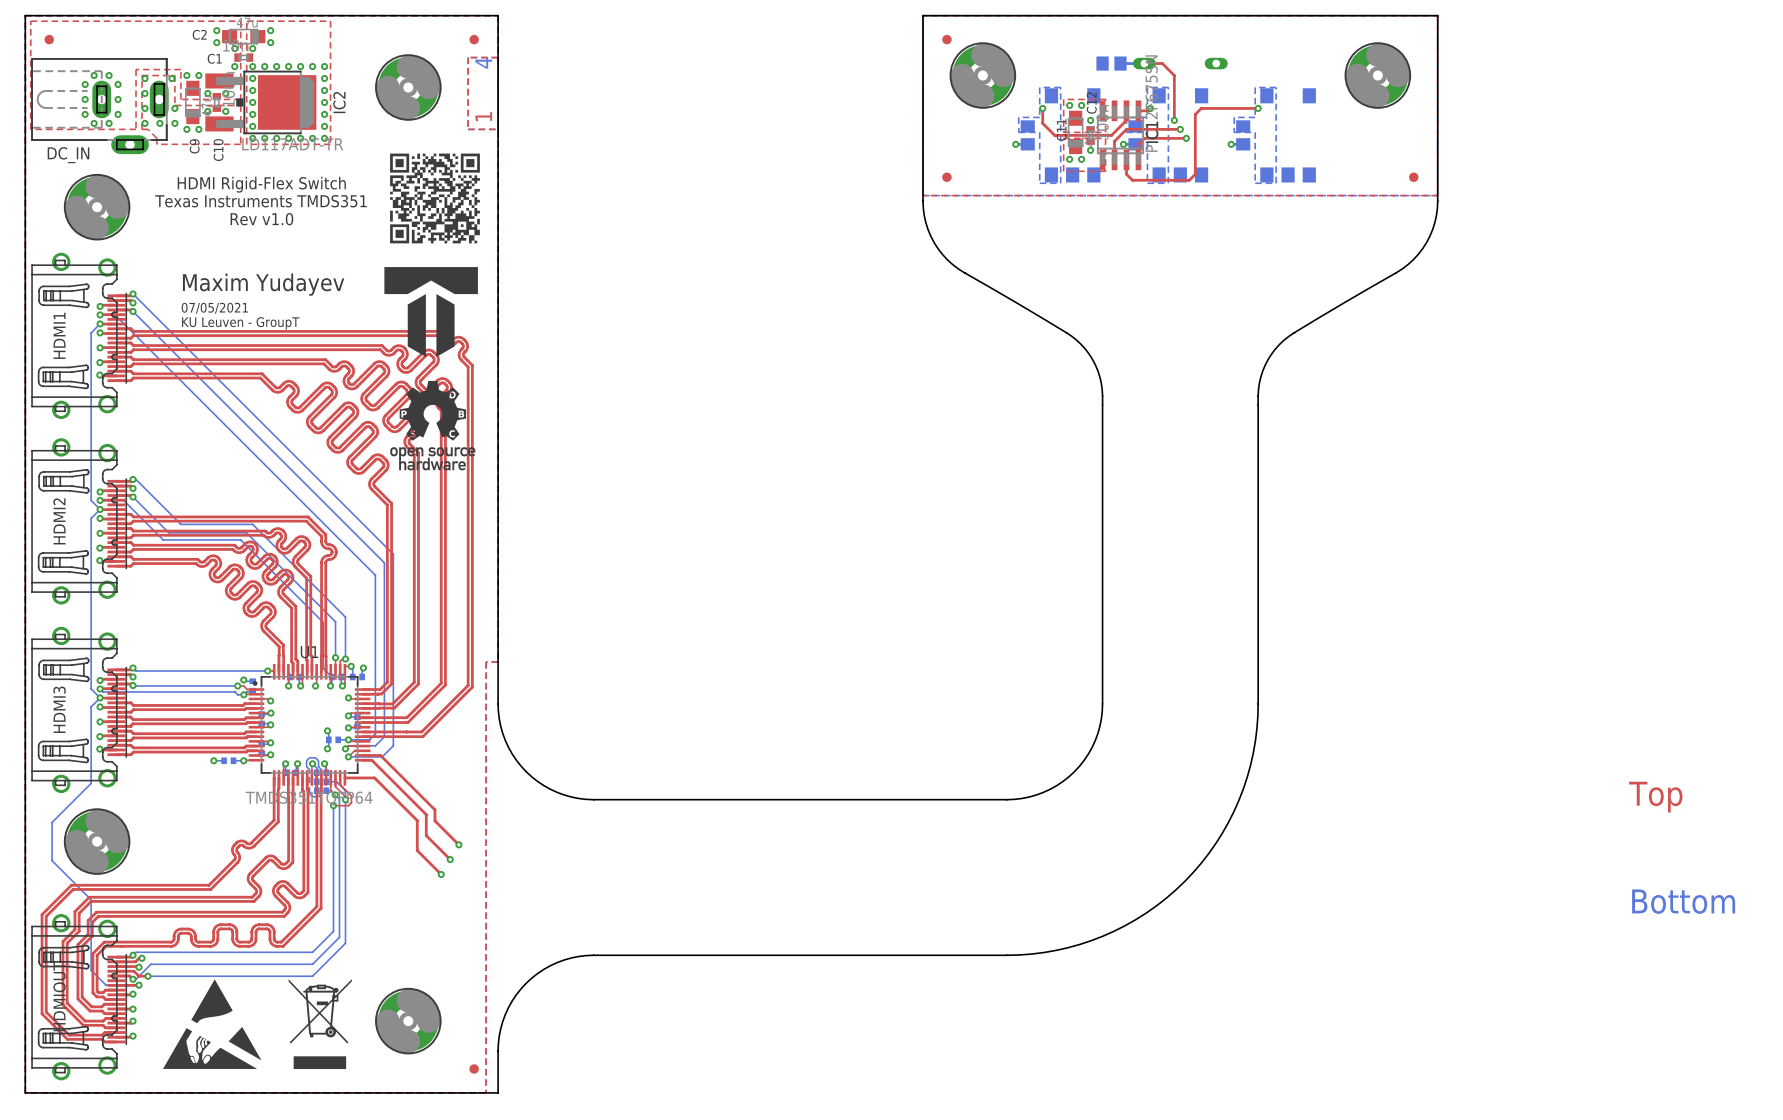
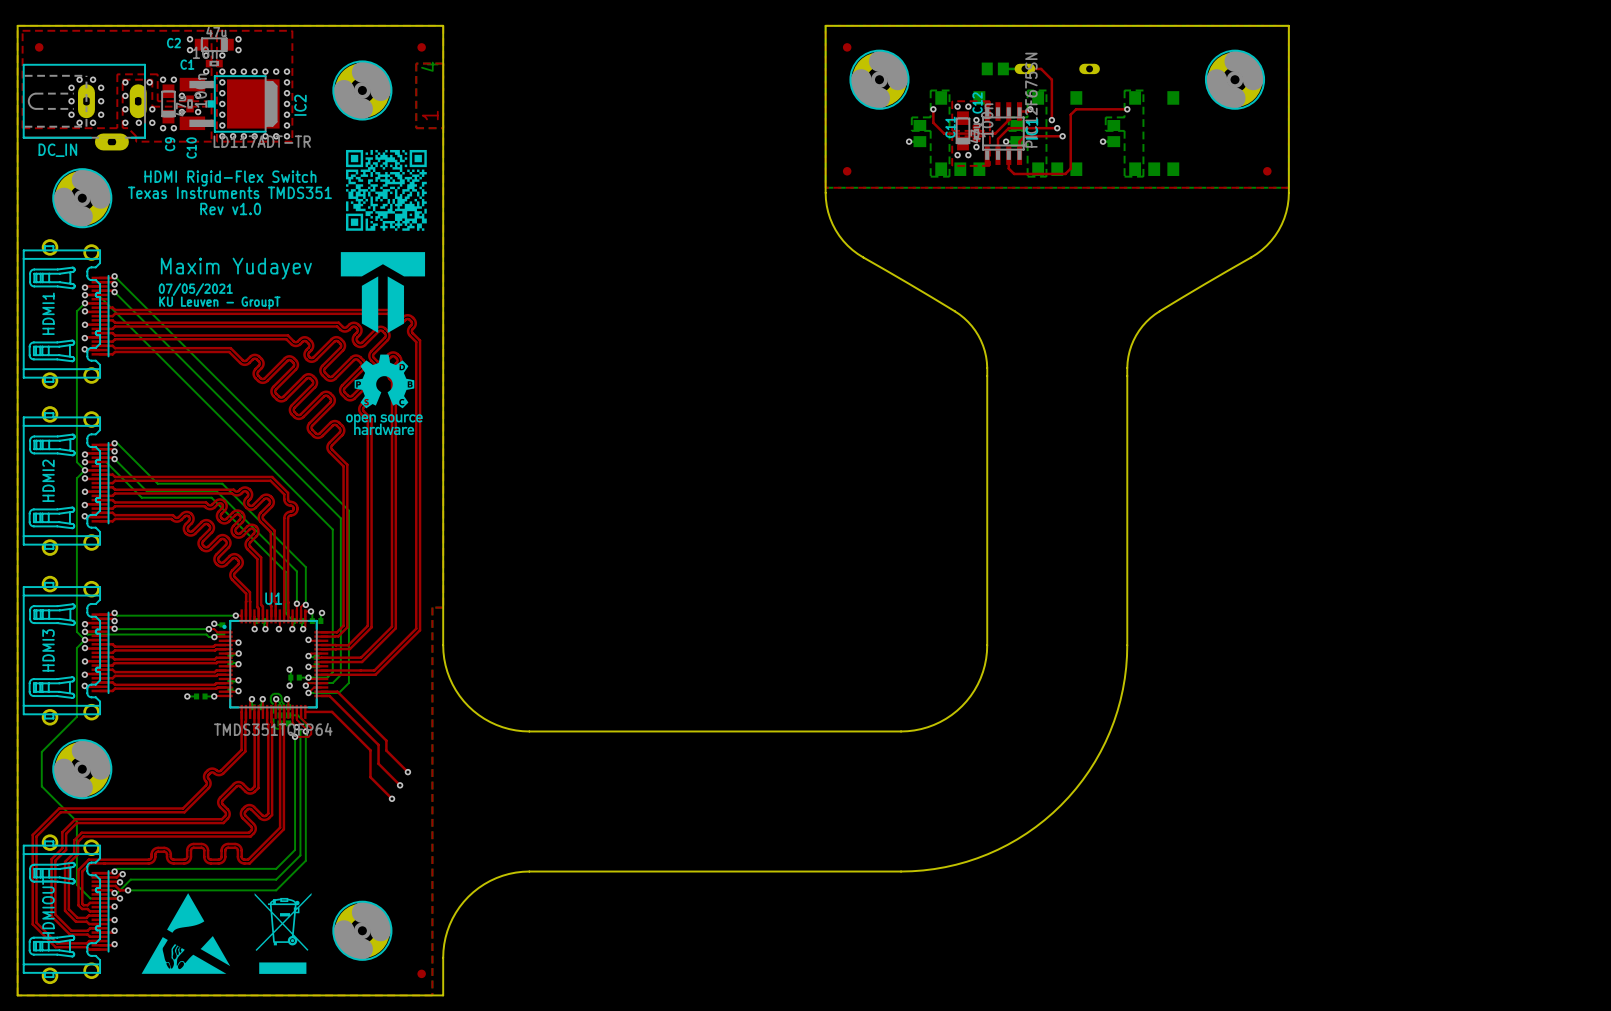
text: Top (1655, 797) -> none
text: Bottom (1683, 901) -> none

